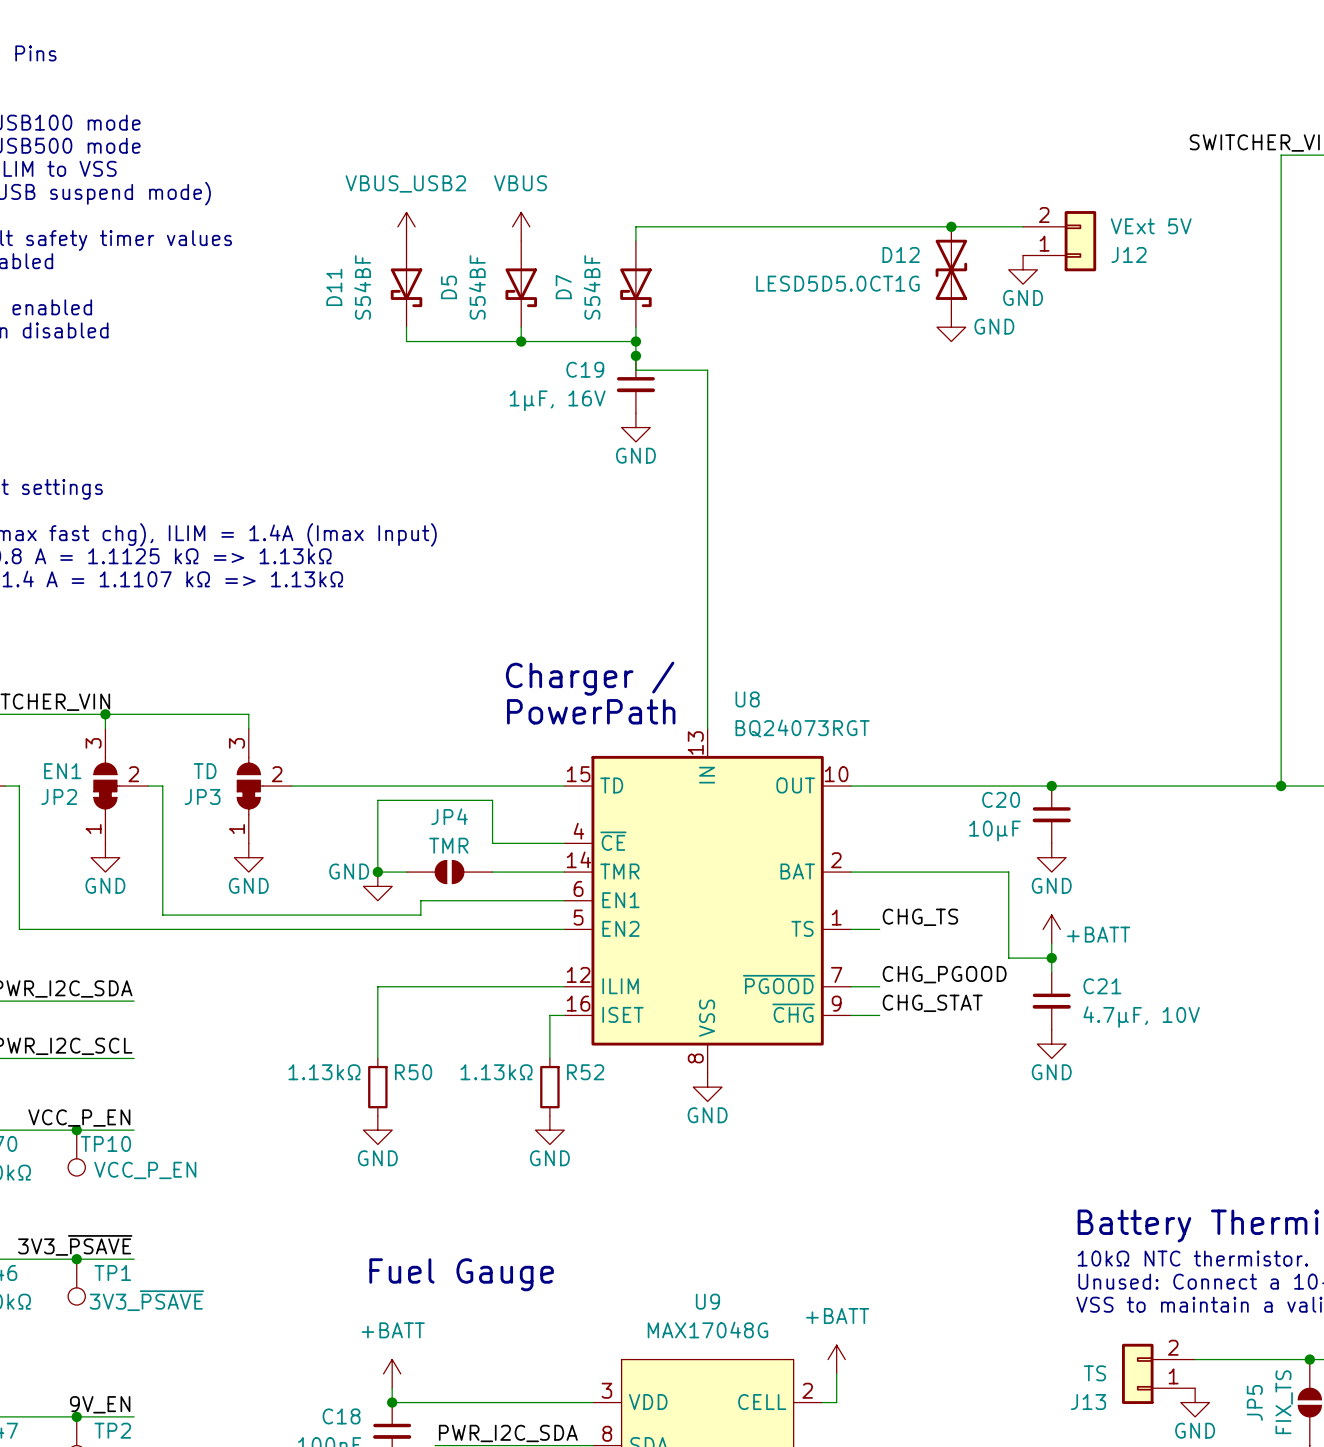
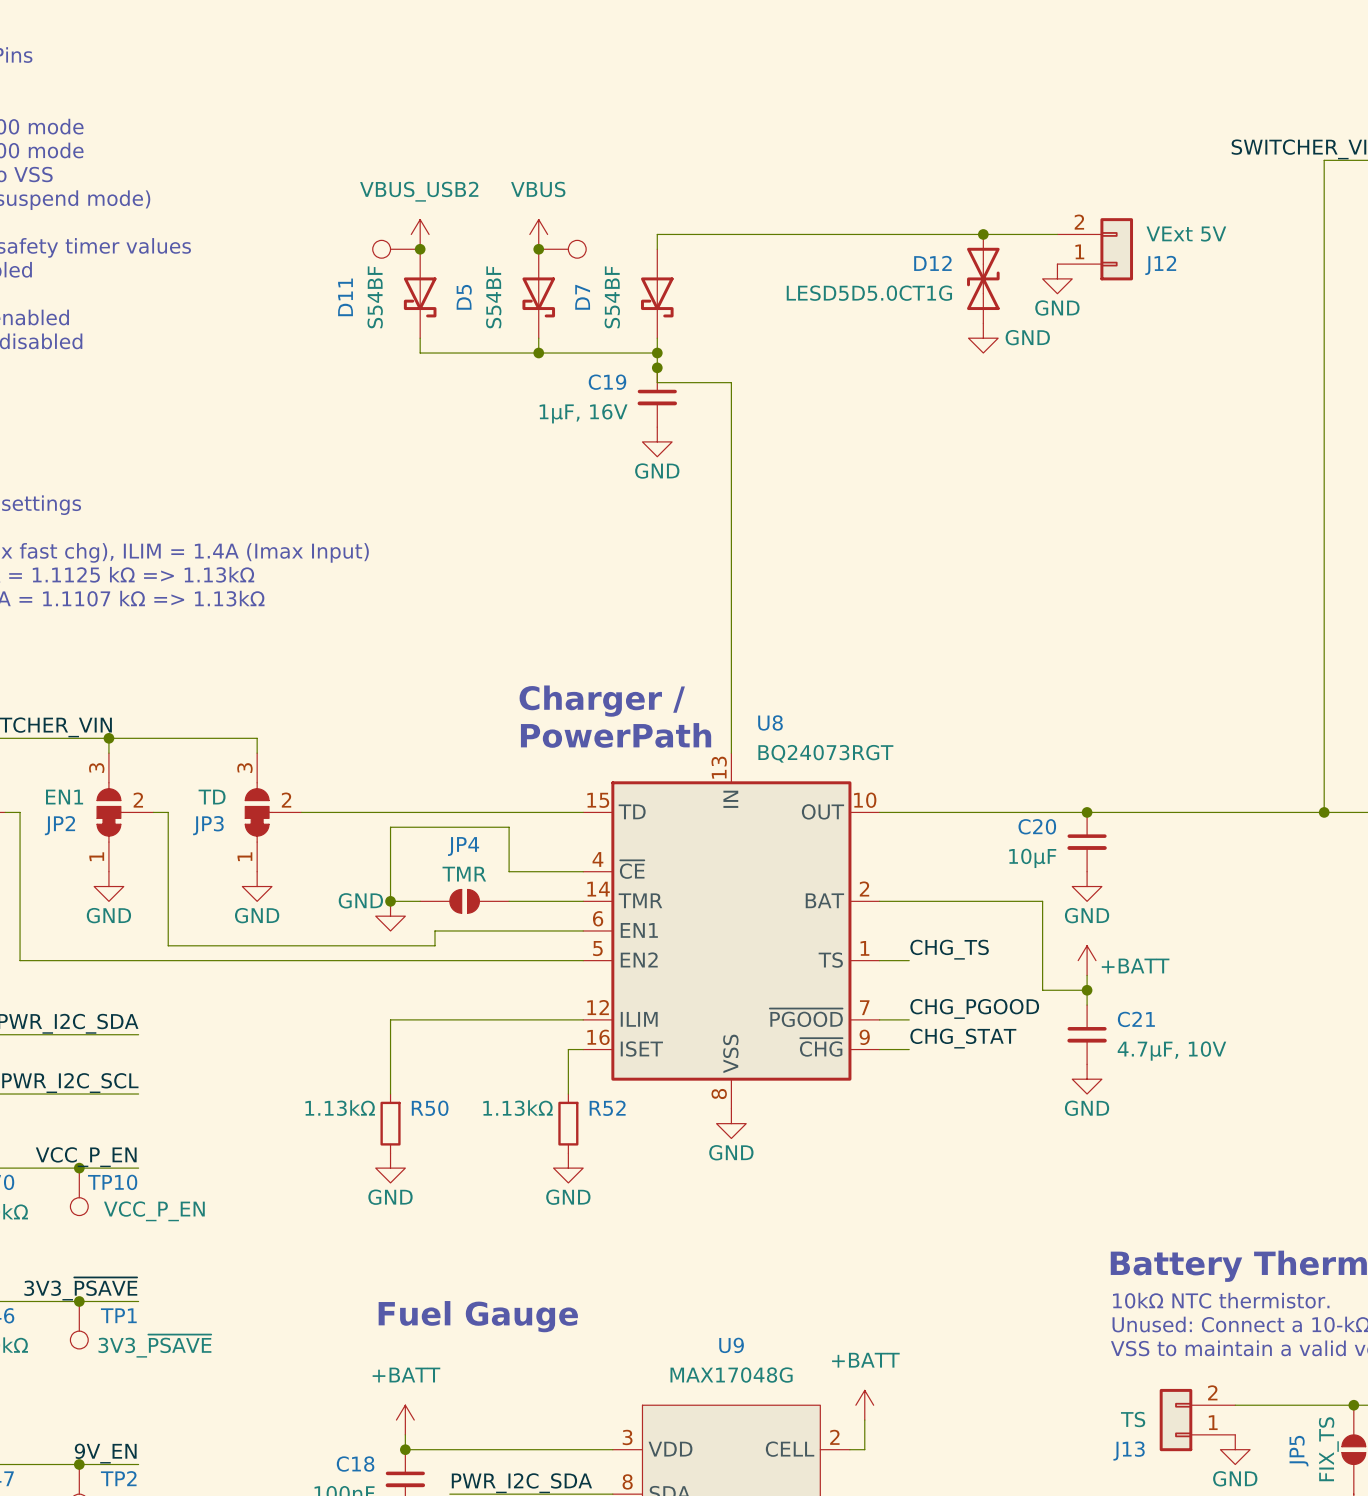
part: none -> (396, 249)
junction: none -> (420, 249)
junction: none -> (538, 249)
part: none -> (562, 249)

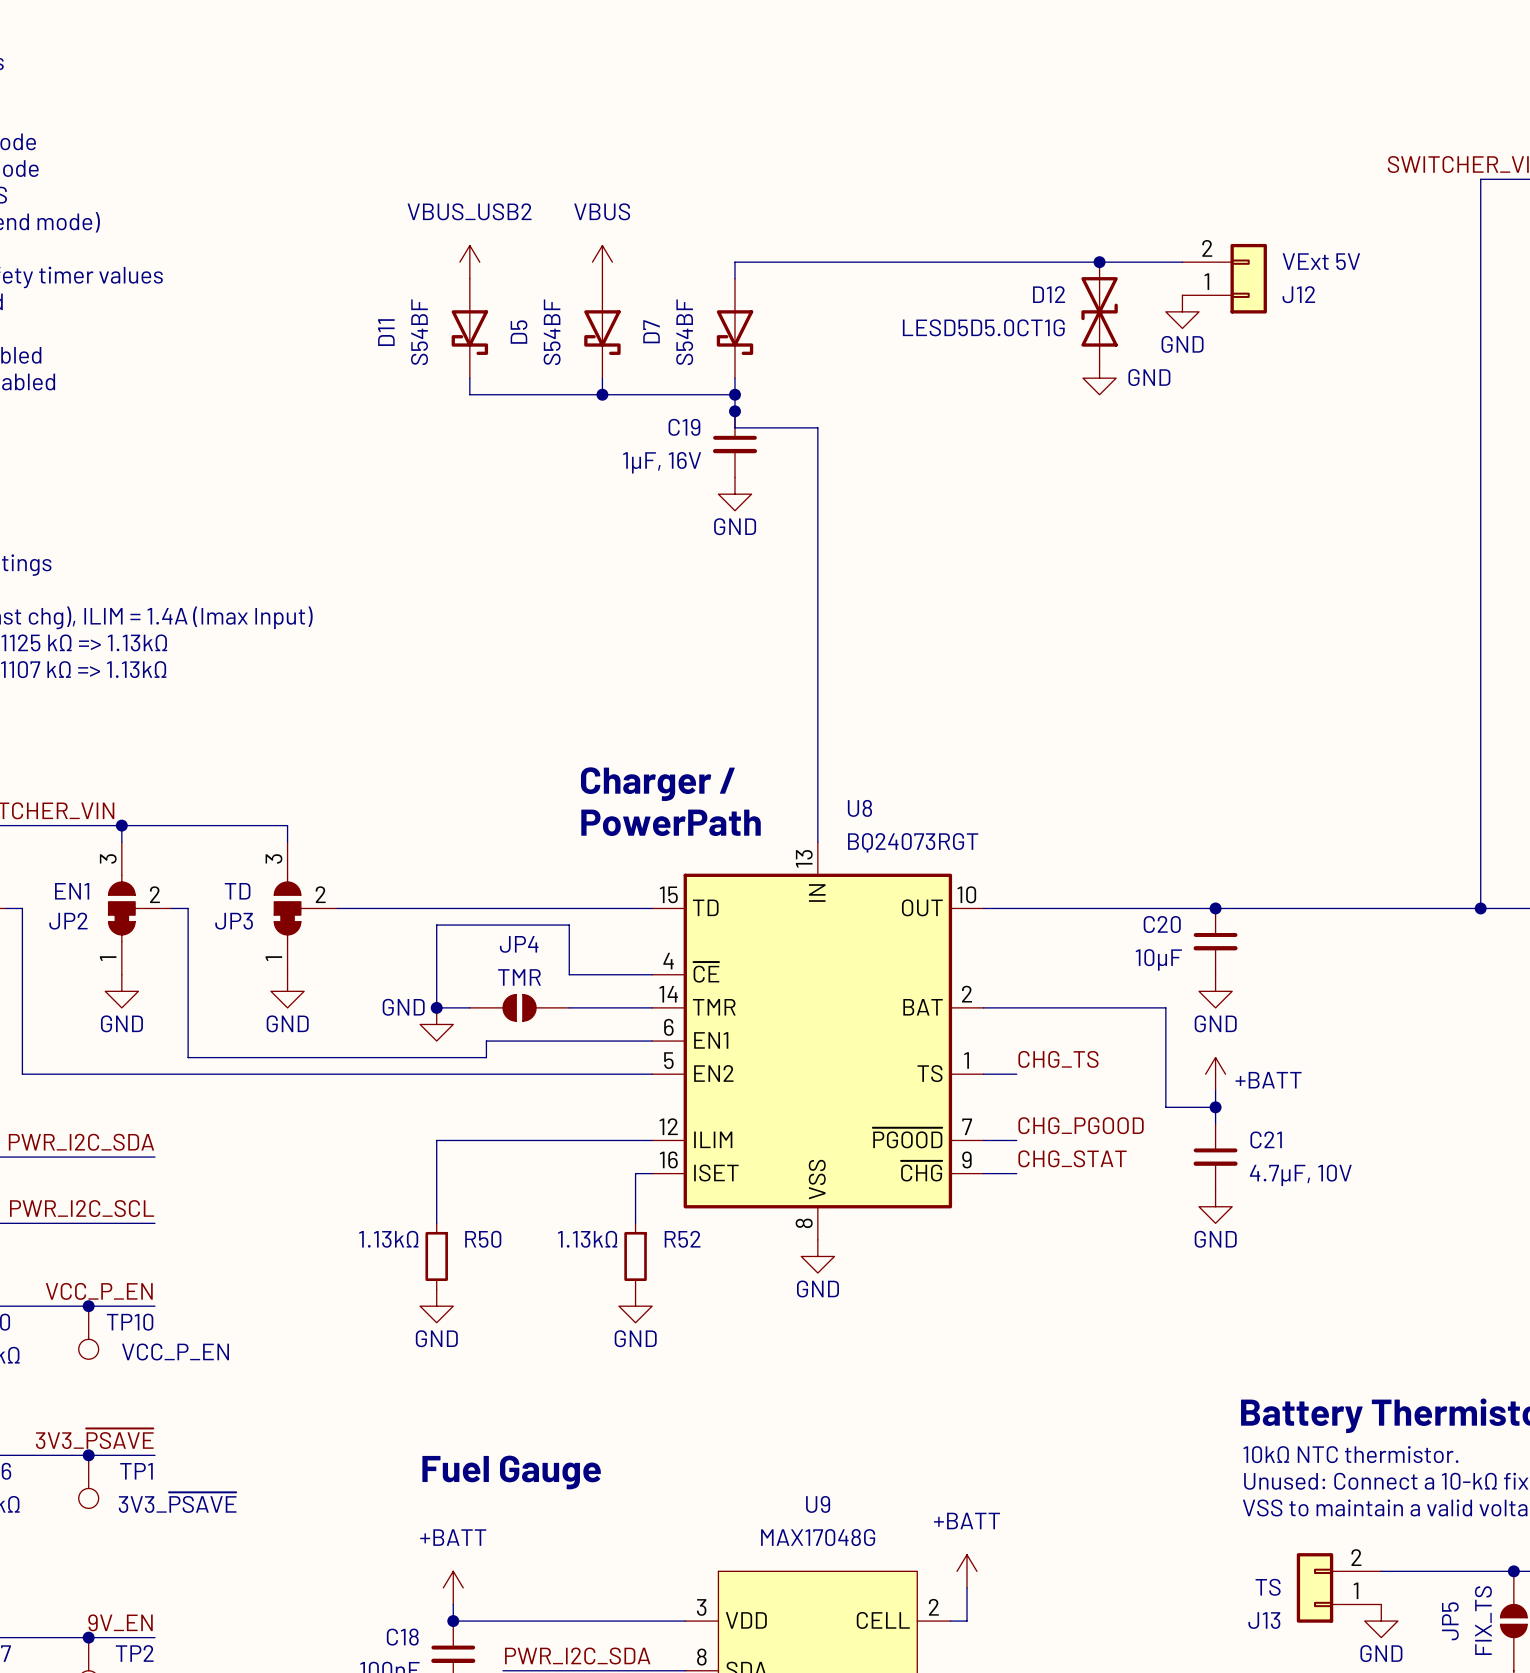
part: (396, 249) -> none
junction: (420, 249) -> none
junction: (538, 249) -> none
part: (562, 249) -> none

